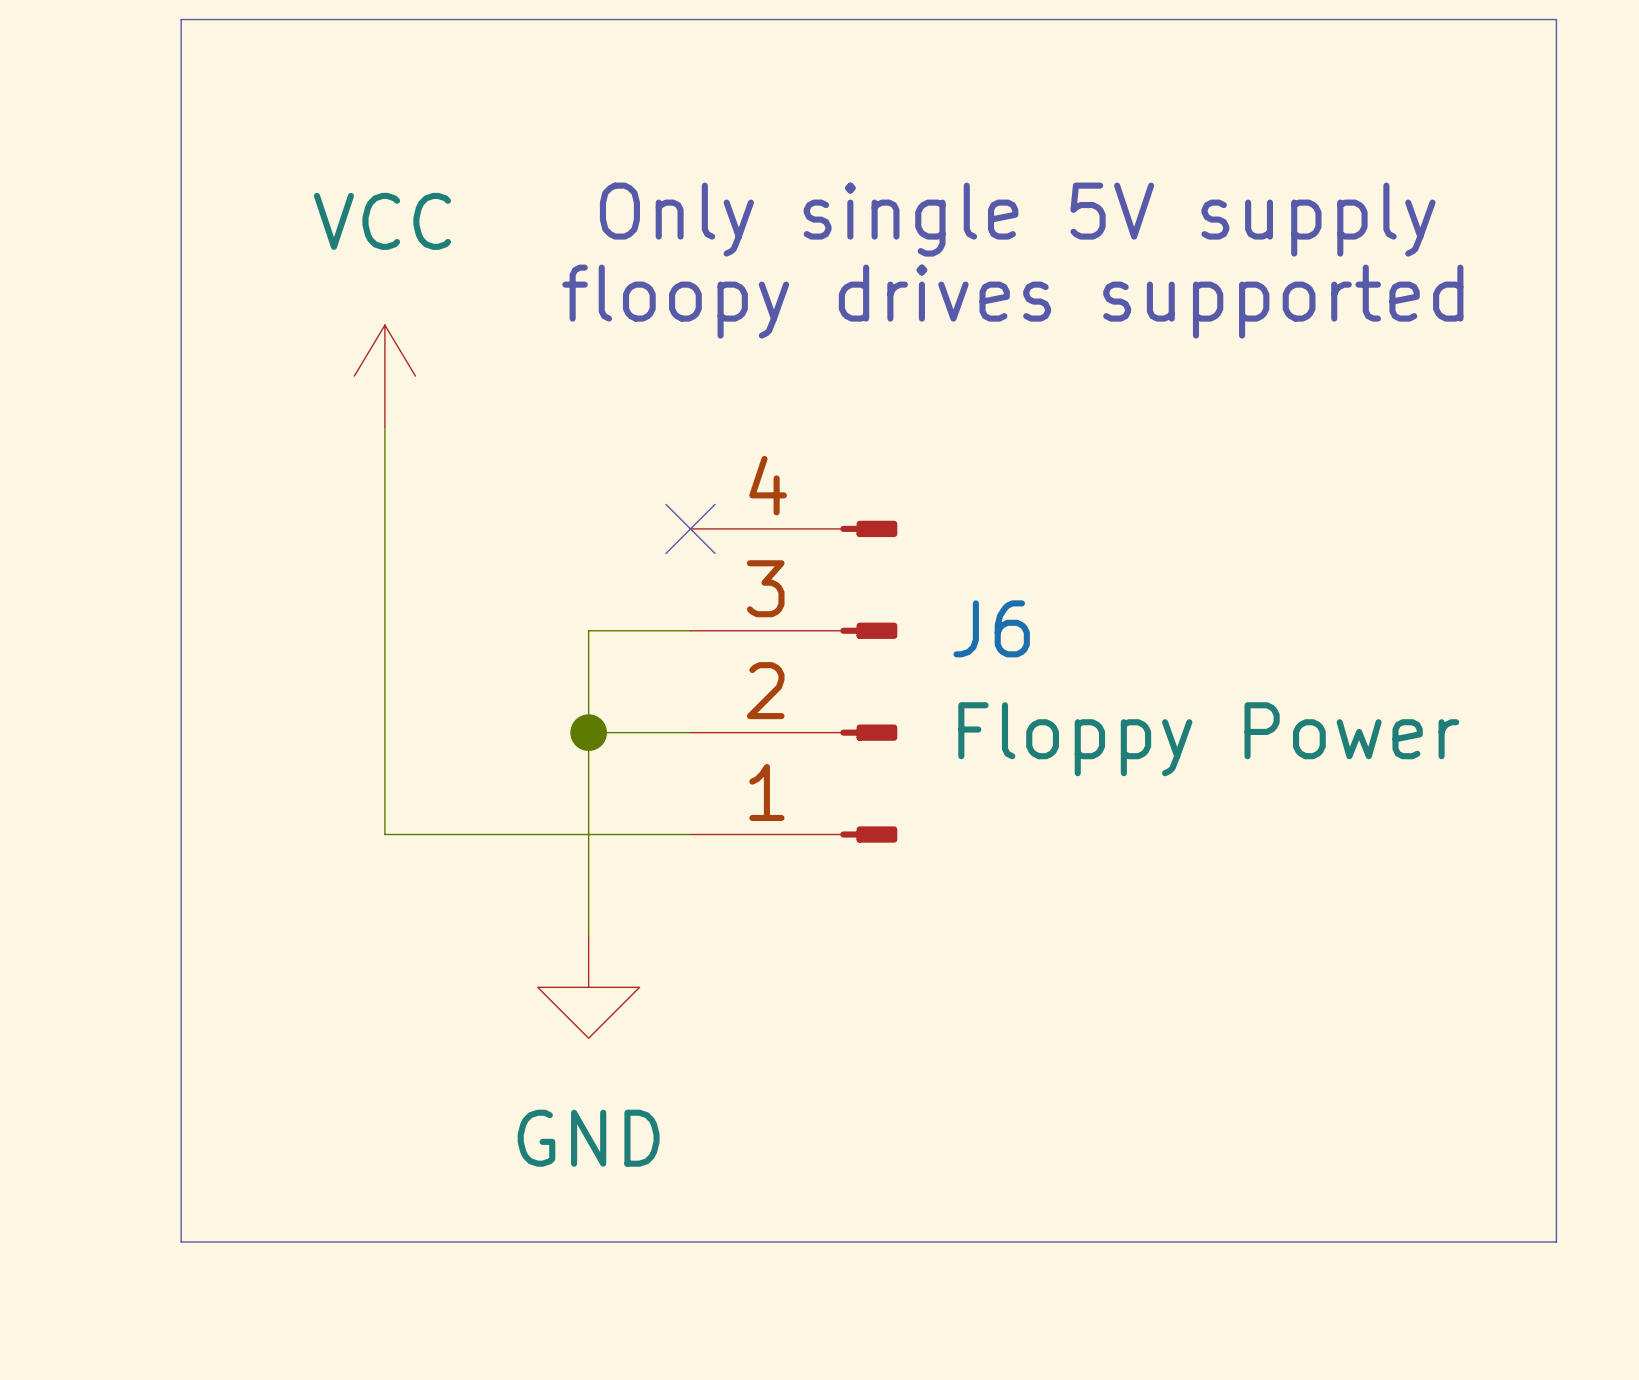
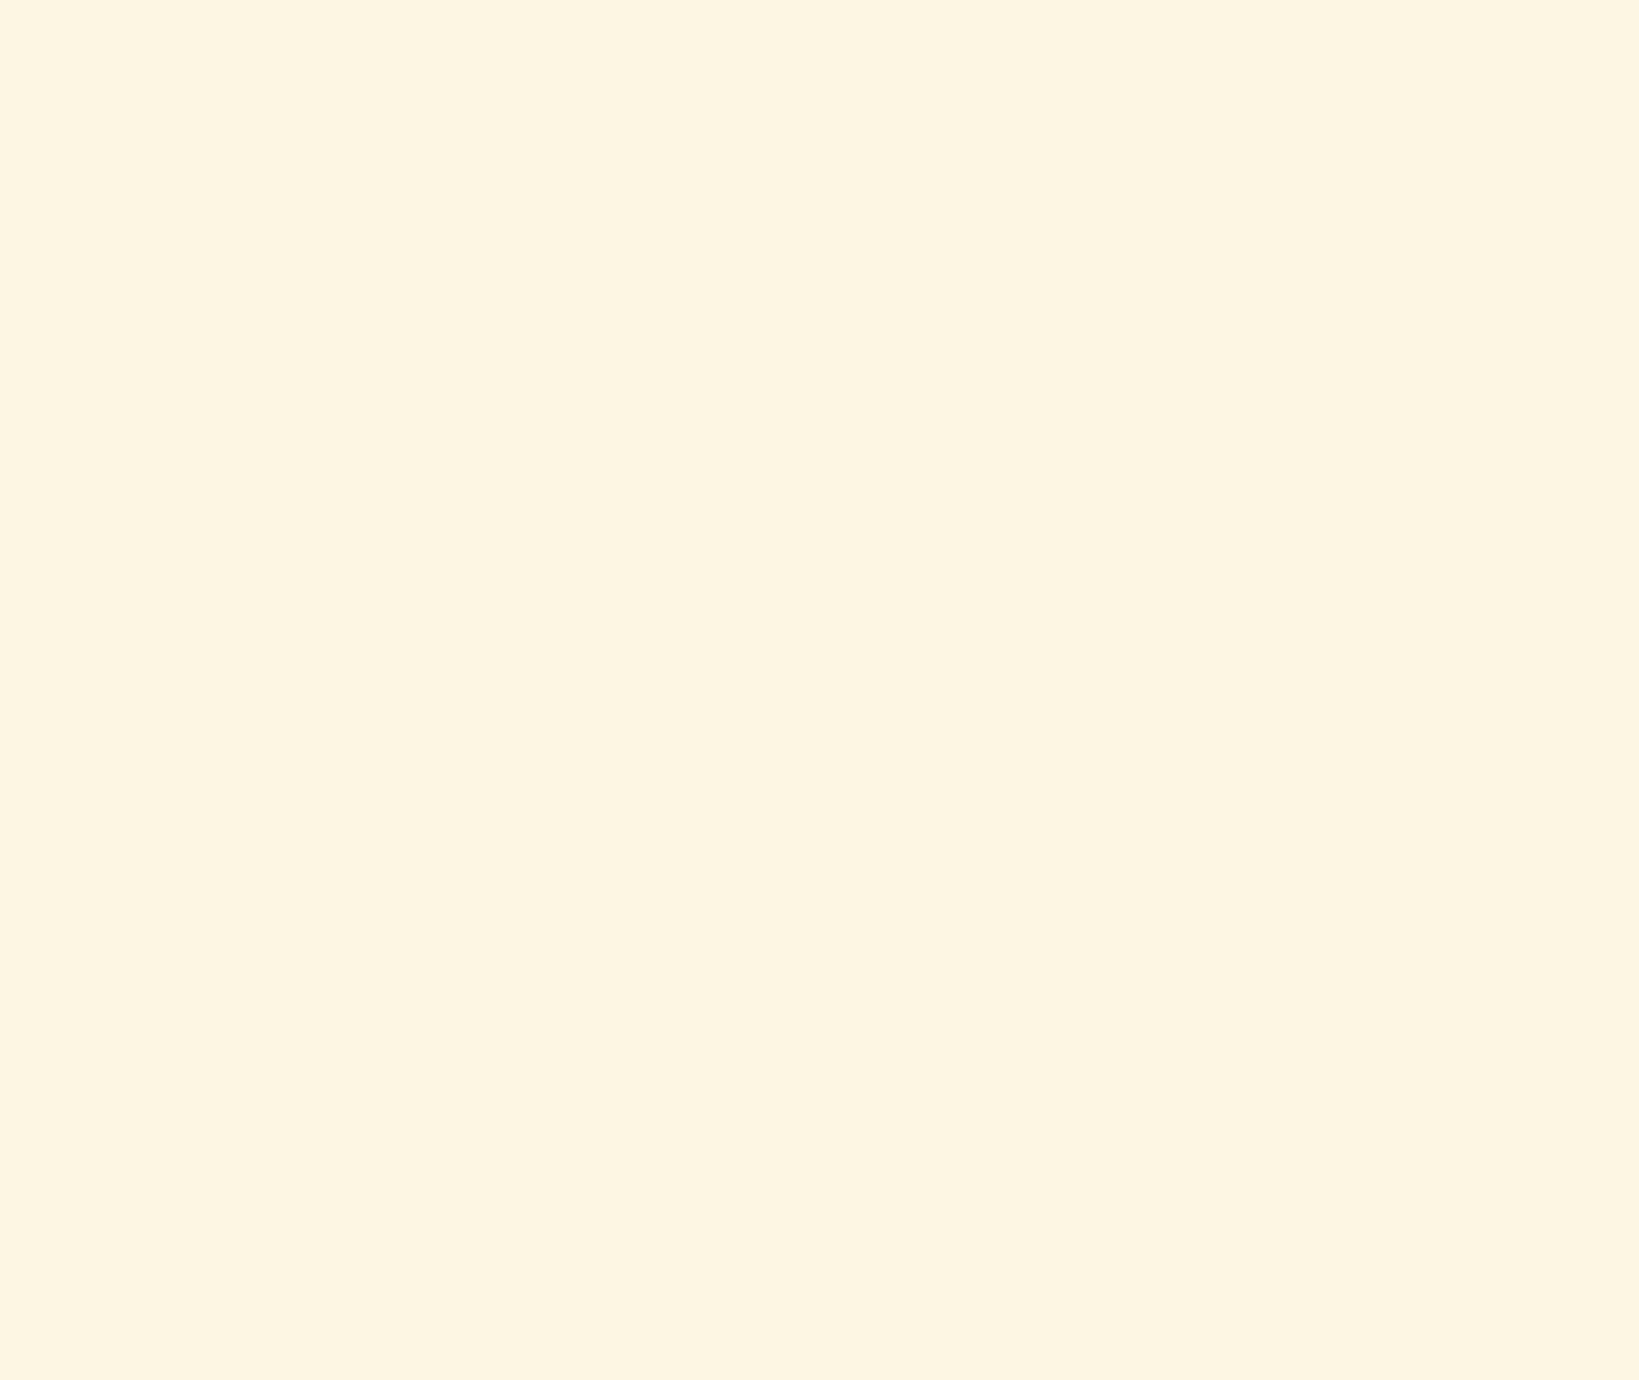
line: (181, 19) (1556, 19) (1556, 1241) (181, 1241) (181, 19) -> none
text: Only single 5V supply (1017, 219) -> none
text: floopy drives supported (1012, 301) -> none
power symbol: VCC (384, 376) -> none
wire: (384, 427) (384, 834) (690, 834) -> none
no-connect mark: (690, 528) -> none
wire: (690, 630) (588, 630) (588, 936) -> none
J6: Floppy Power (793, 681) -> none
wire: (588, 732) (690, 732) -> none
junction: (588, 732) -> none
power symbol: GND (588, 987) -> none

